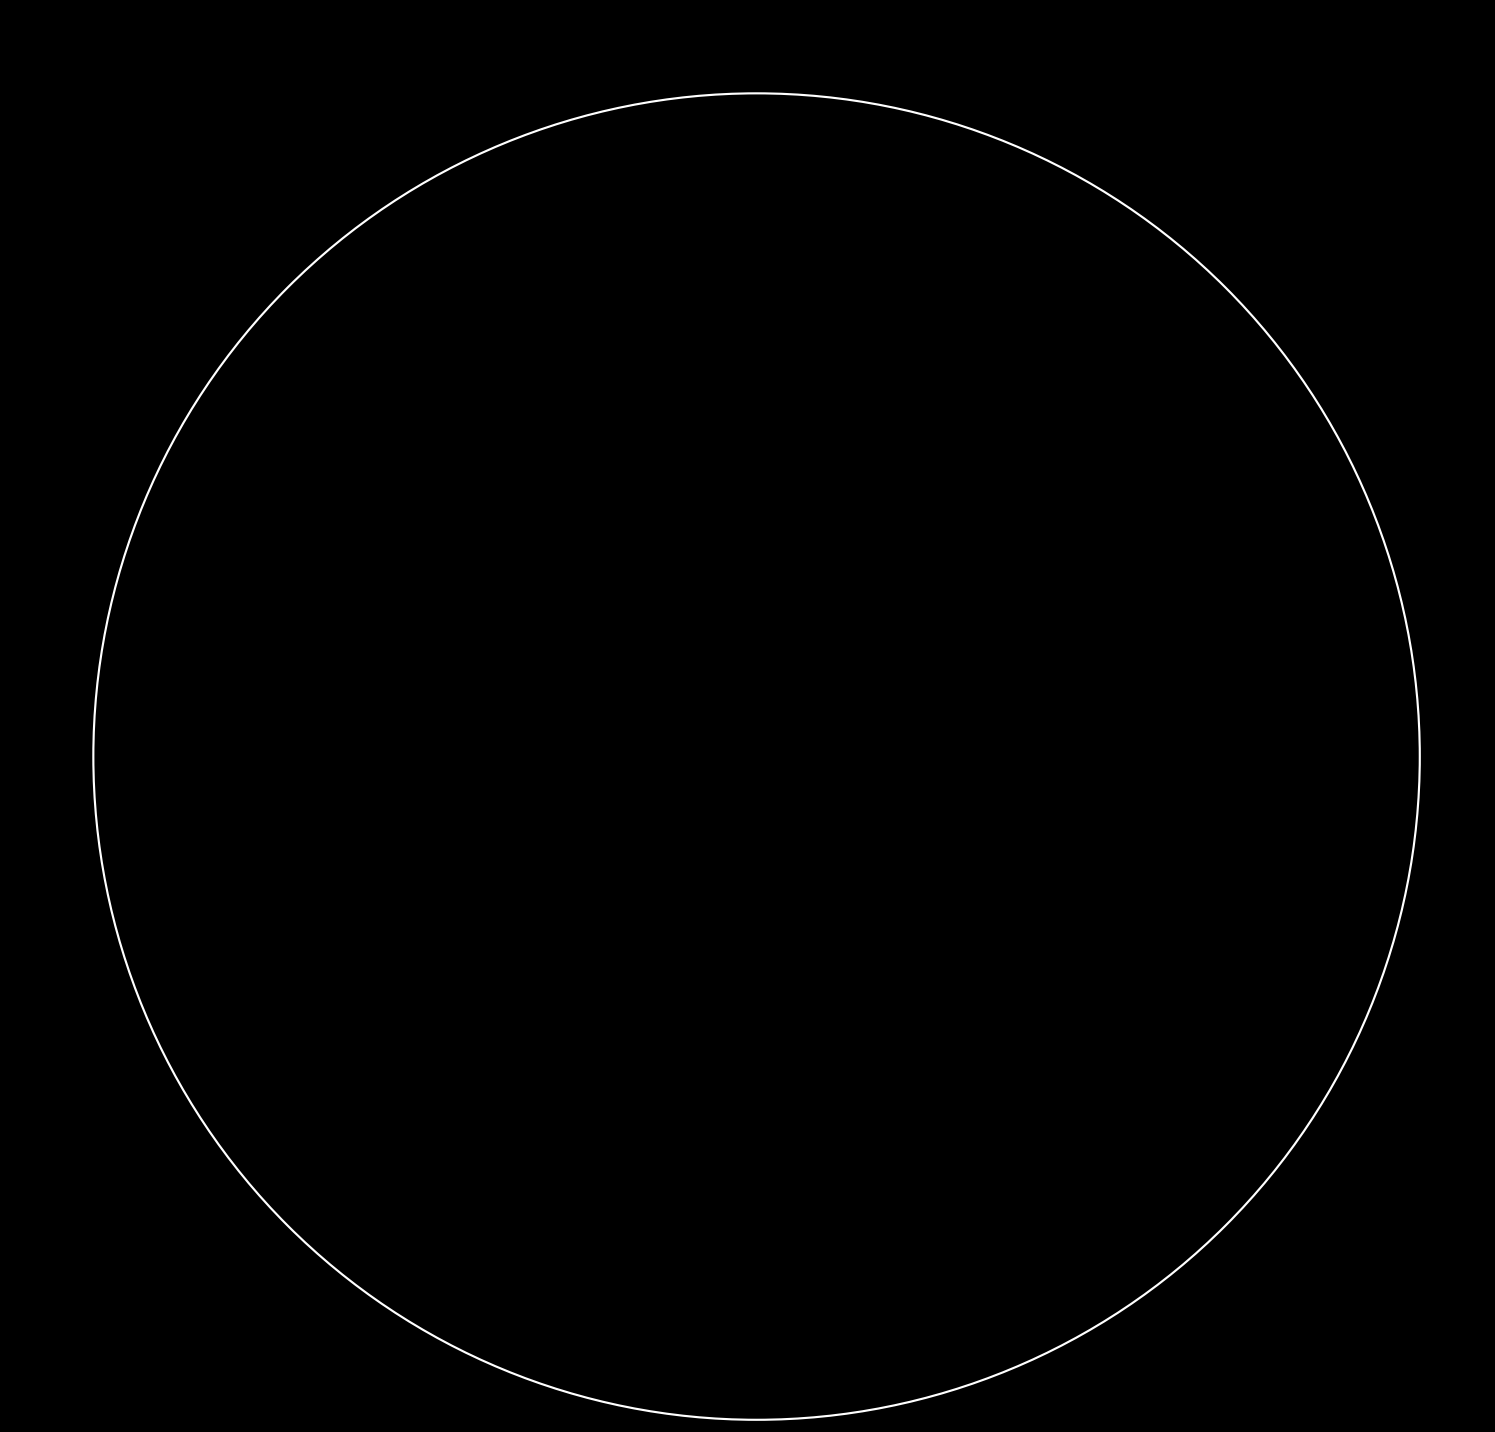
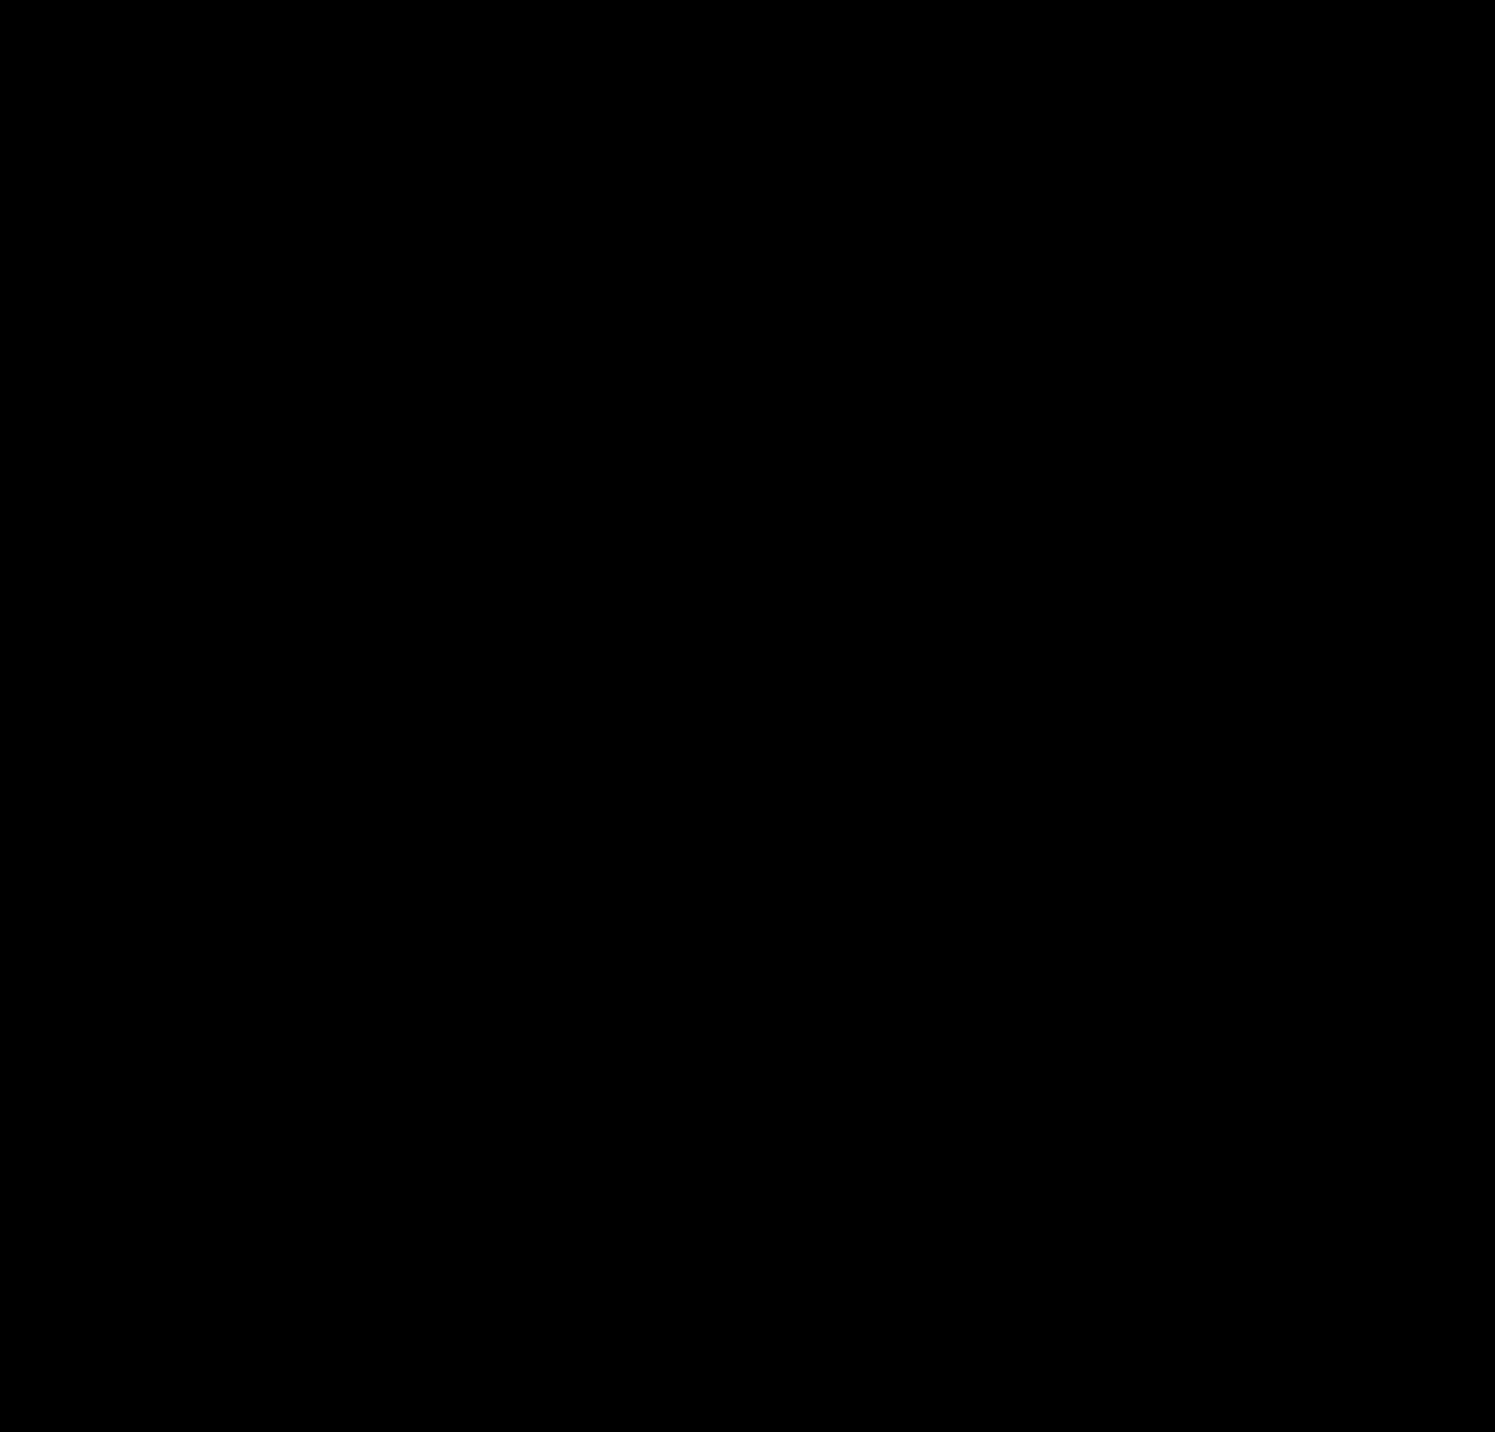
round board edge: [92, 92, 1421, 1421] -> none

